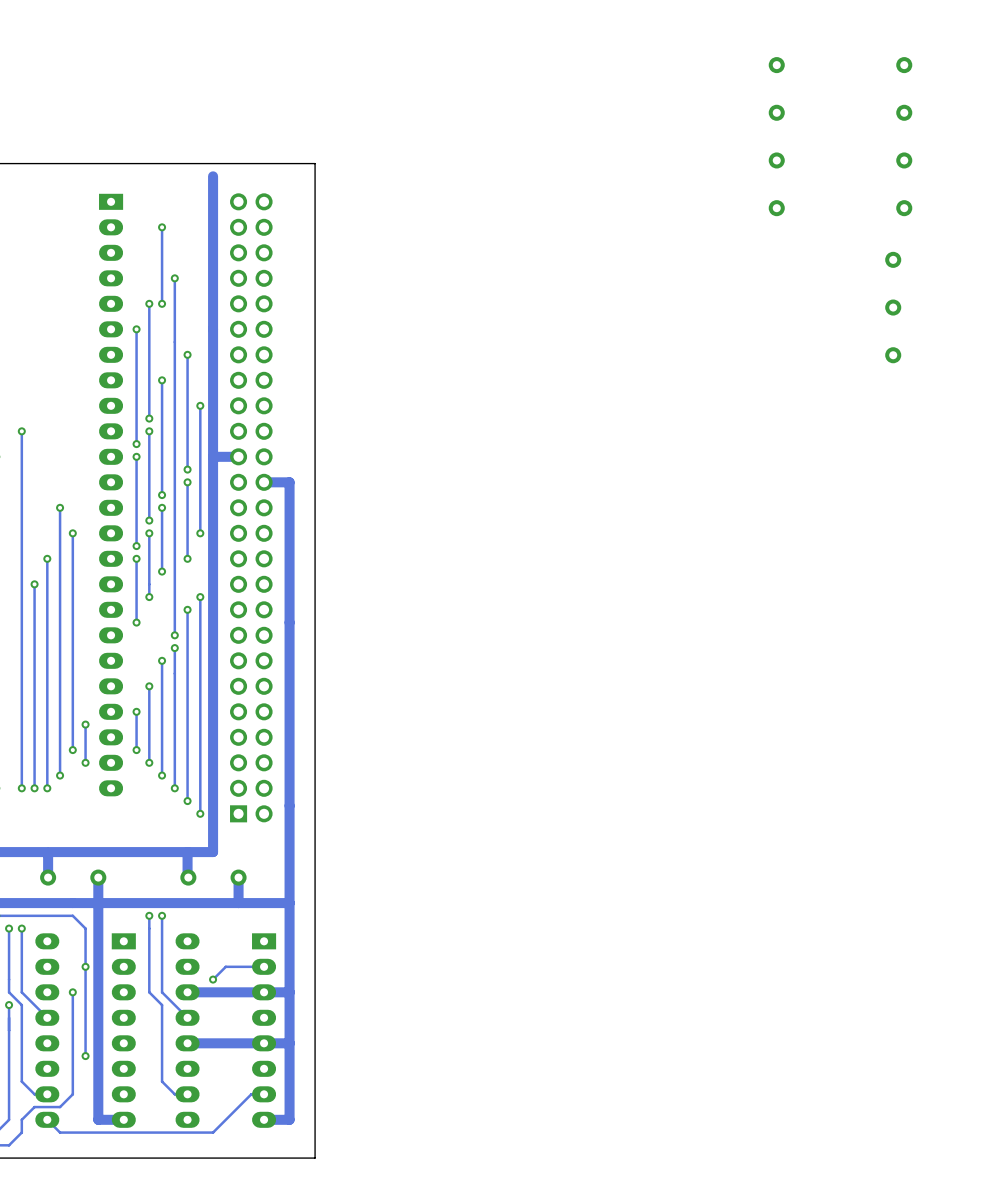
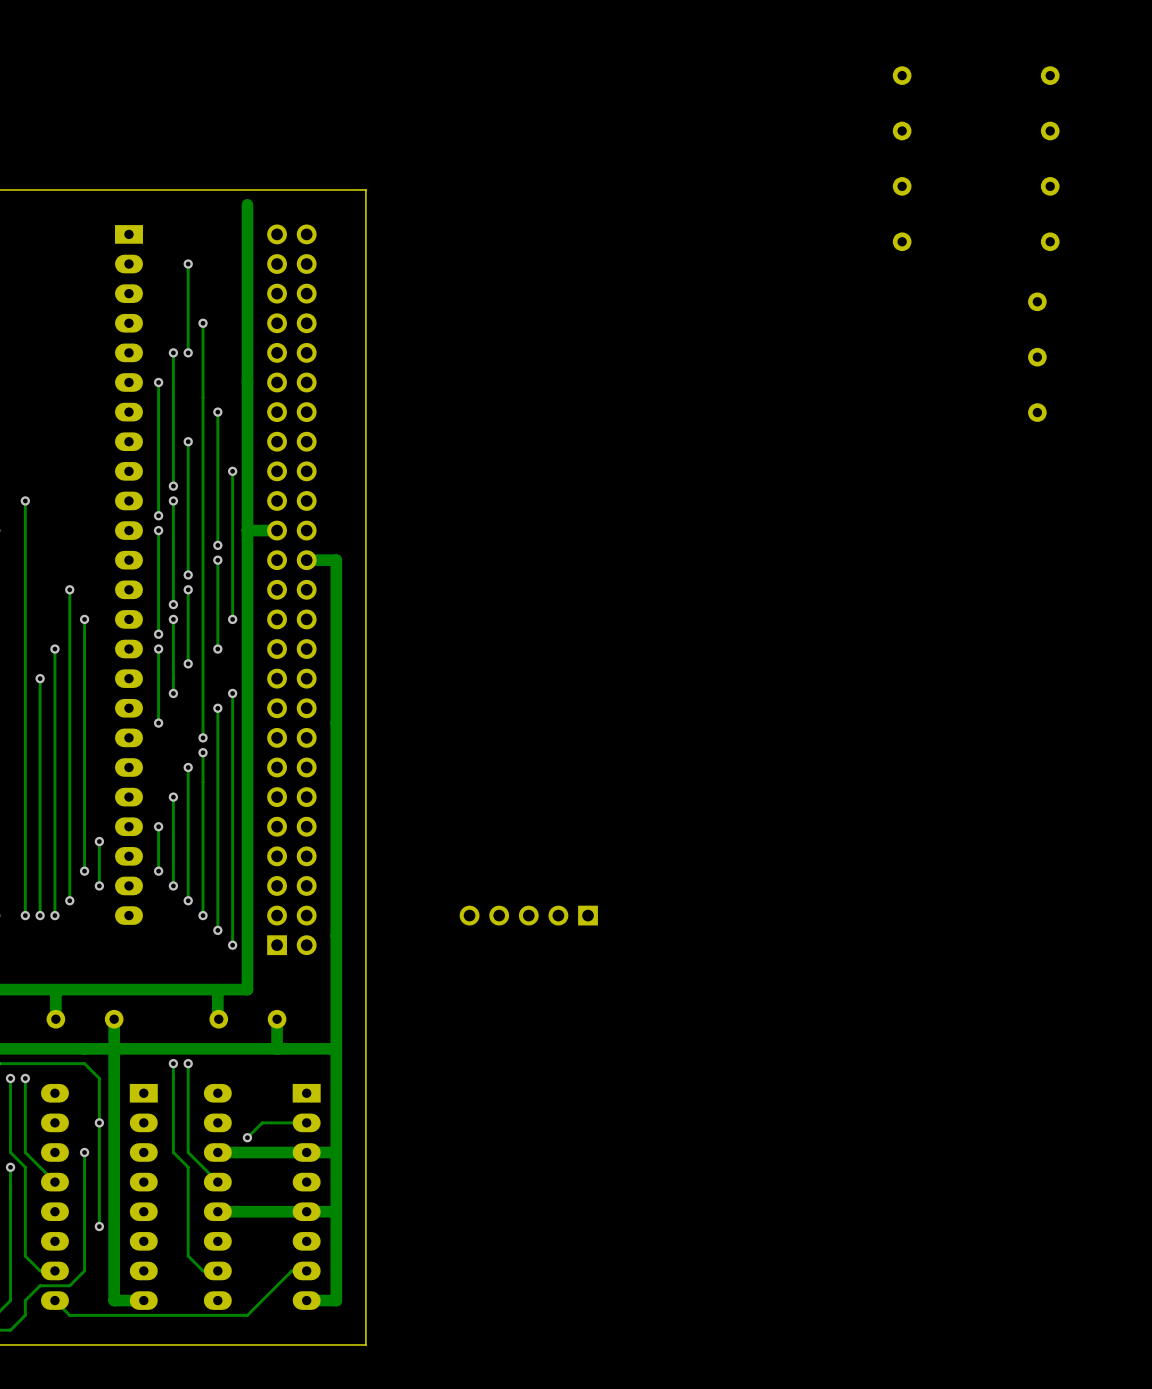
part: none -> (528, 915)

